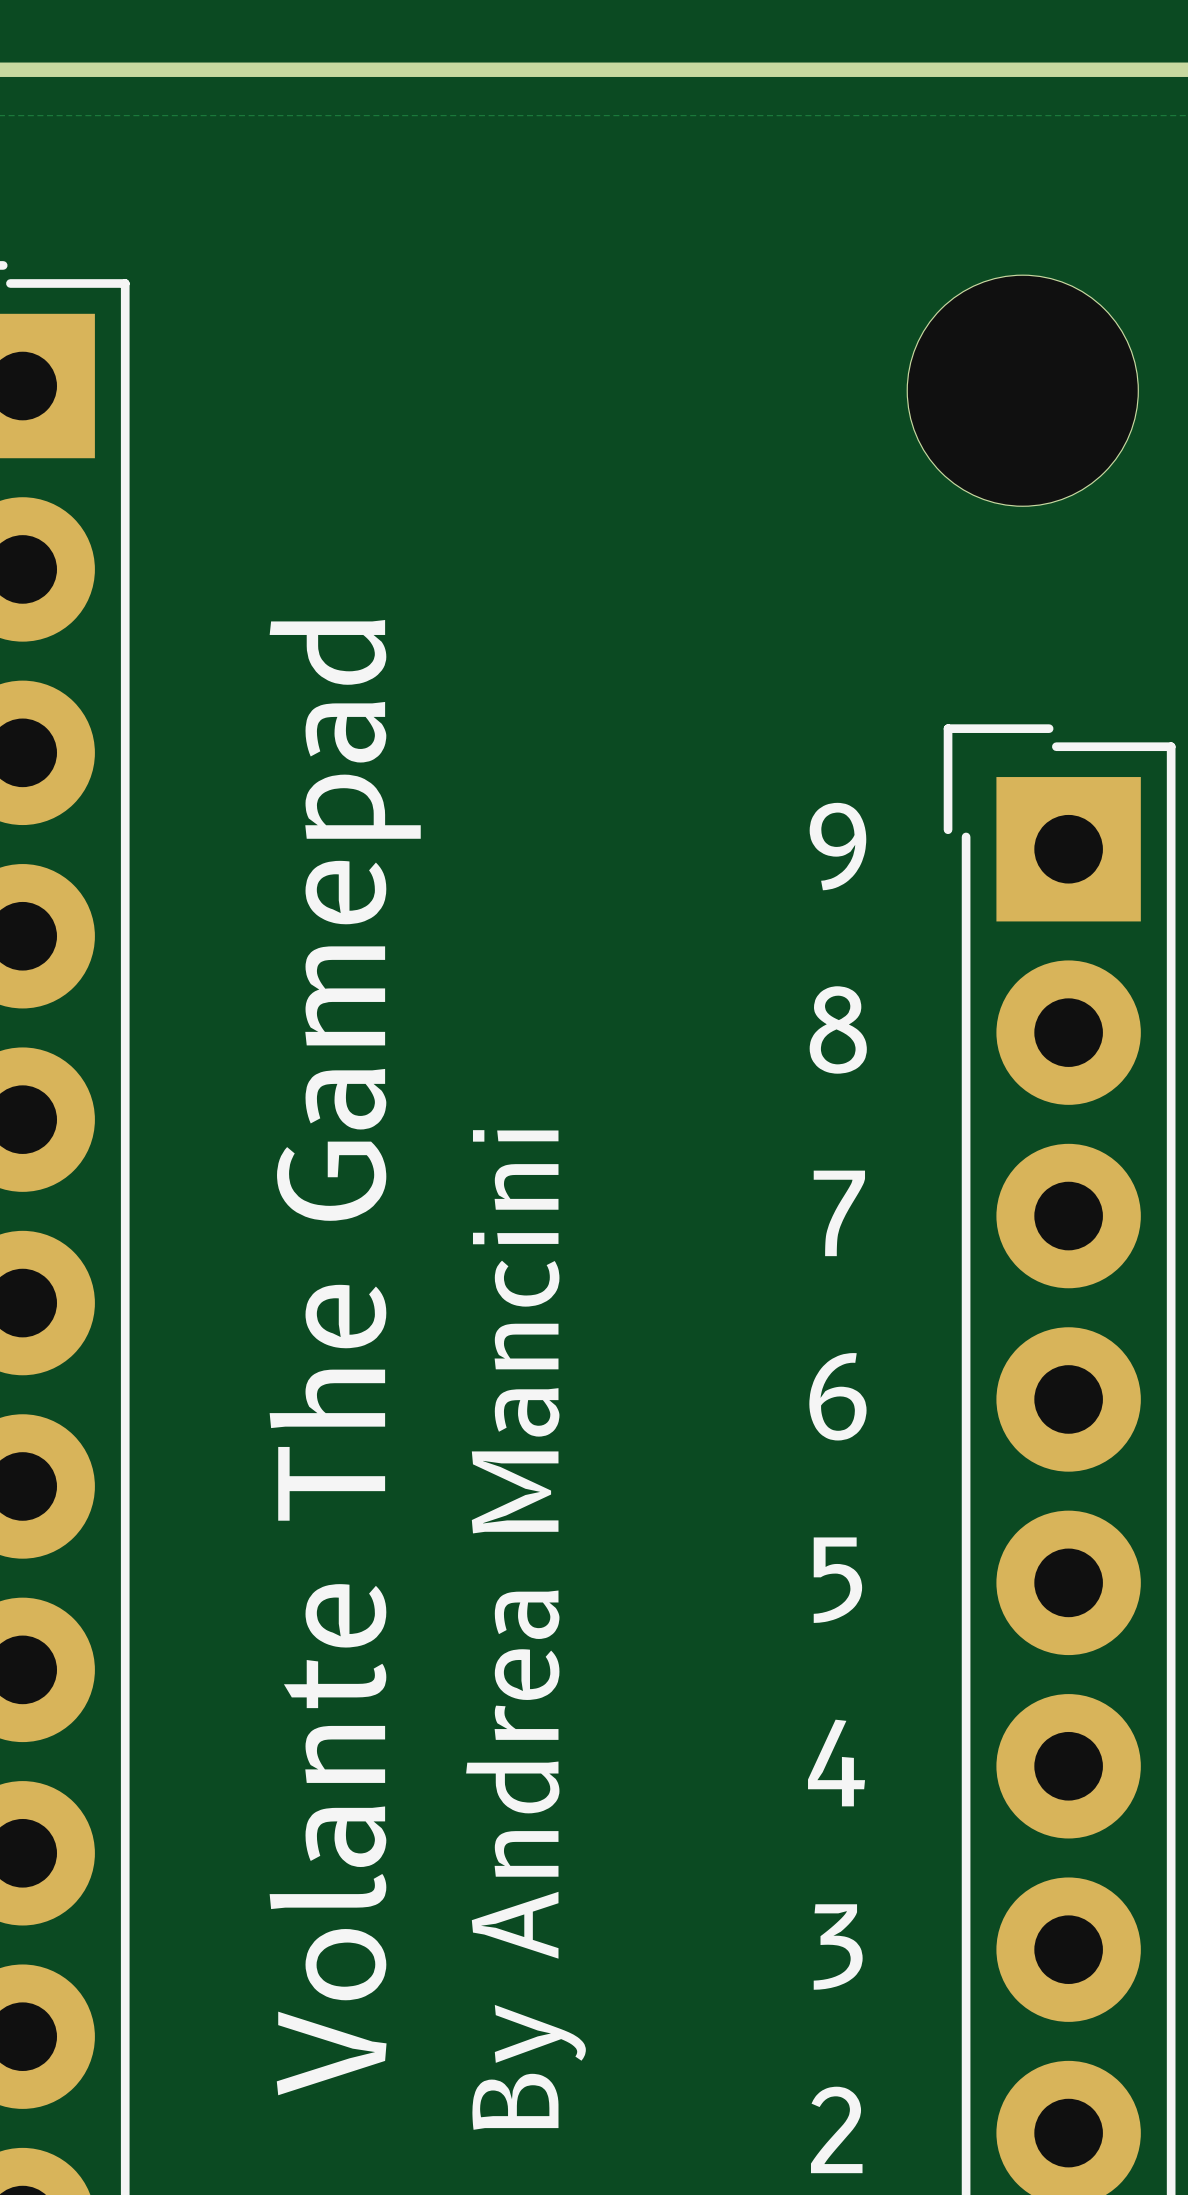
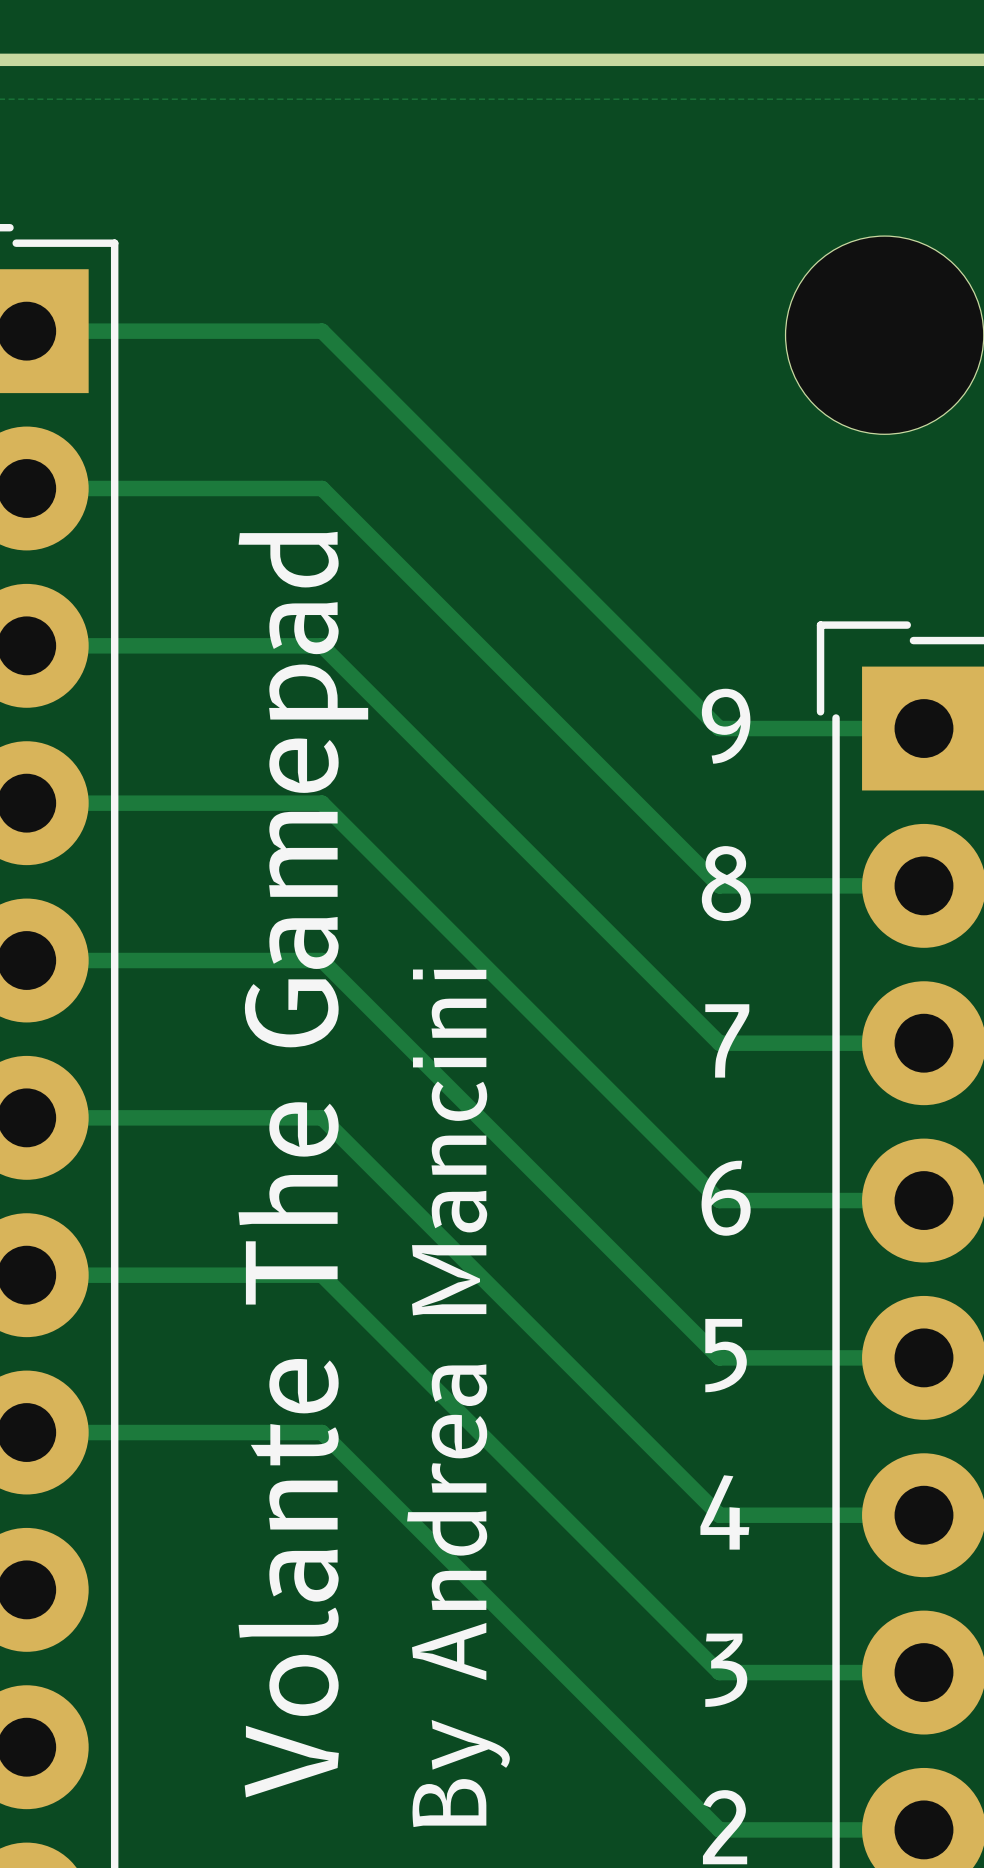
track: none -> (26, 331) (322, 331) (719, 728) (923, 728)
track: none -> (26, 488) (322, 488) (719, 885) (923, 885)
track: none -> (26, 645) (322, 645) (719, 1043) (923, 1043)
track: none -> (26, 803) (322, 803) (719, 1200) (923, 1200)
track: none -> (26, 960) (322, 960) (719, 1357) (923, 1357)
track: none -> (26, 1117) (322, 1117) (719, 1515) (923, 1515)
track: none -> (26, 1275) (322, 1275) (719, 1672) (923, 1672)
track: none -> (26, 1432) (322, 1432) (719, 1829) (923, 1829)

